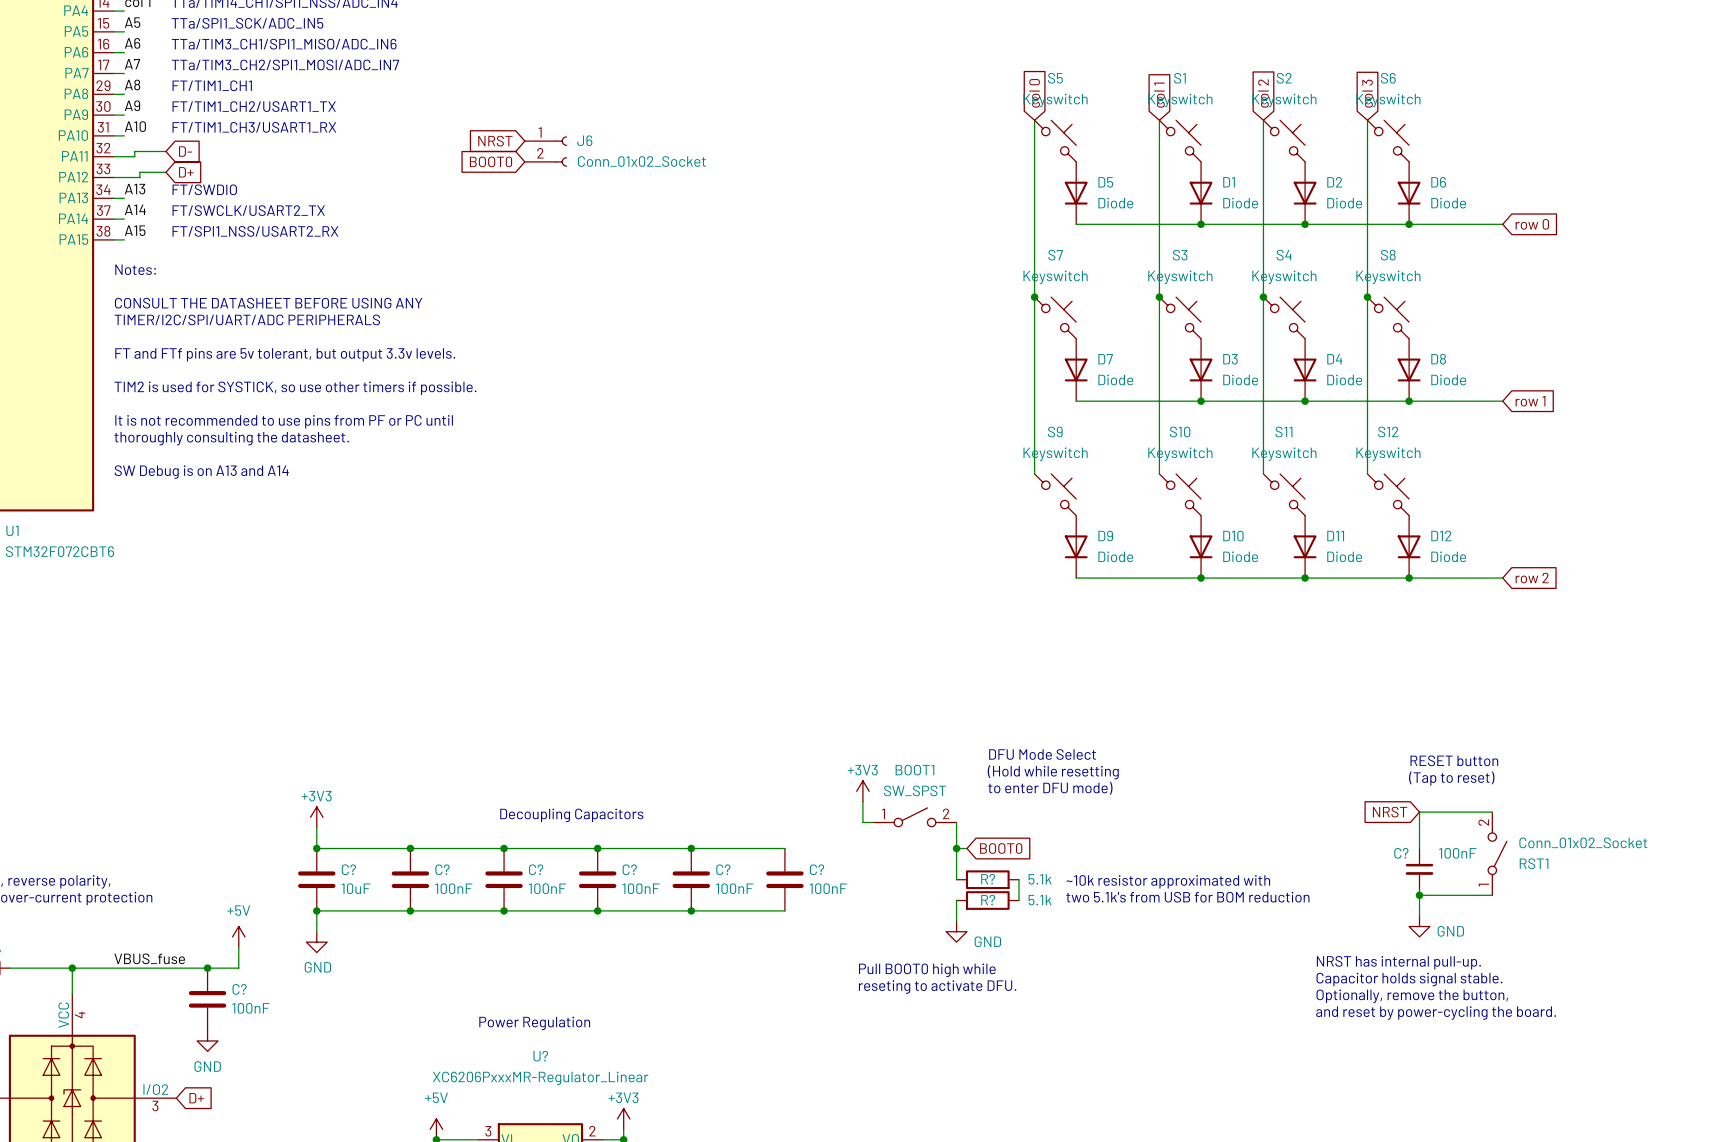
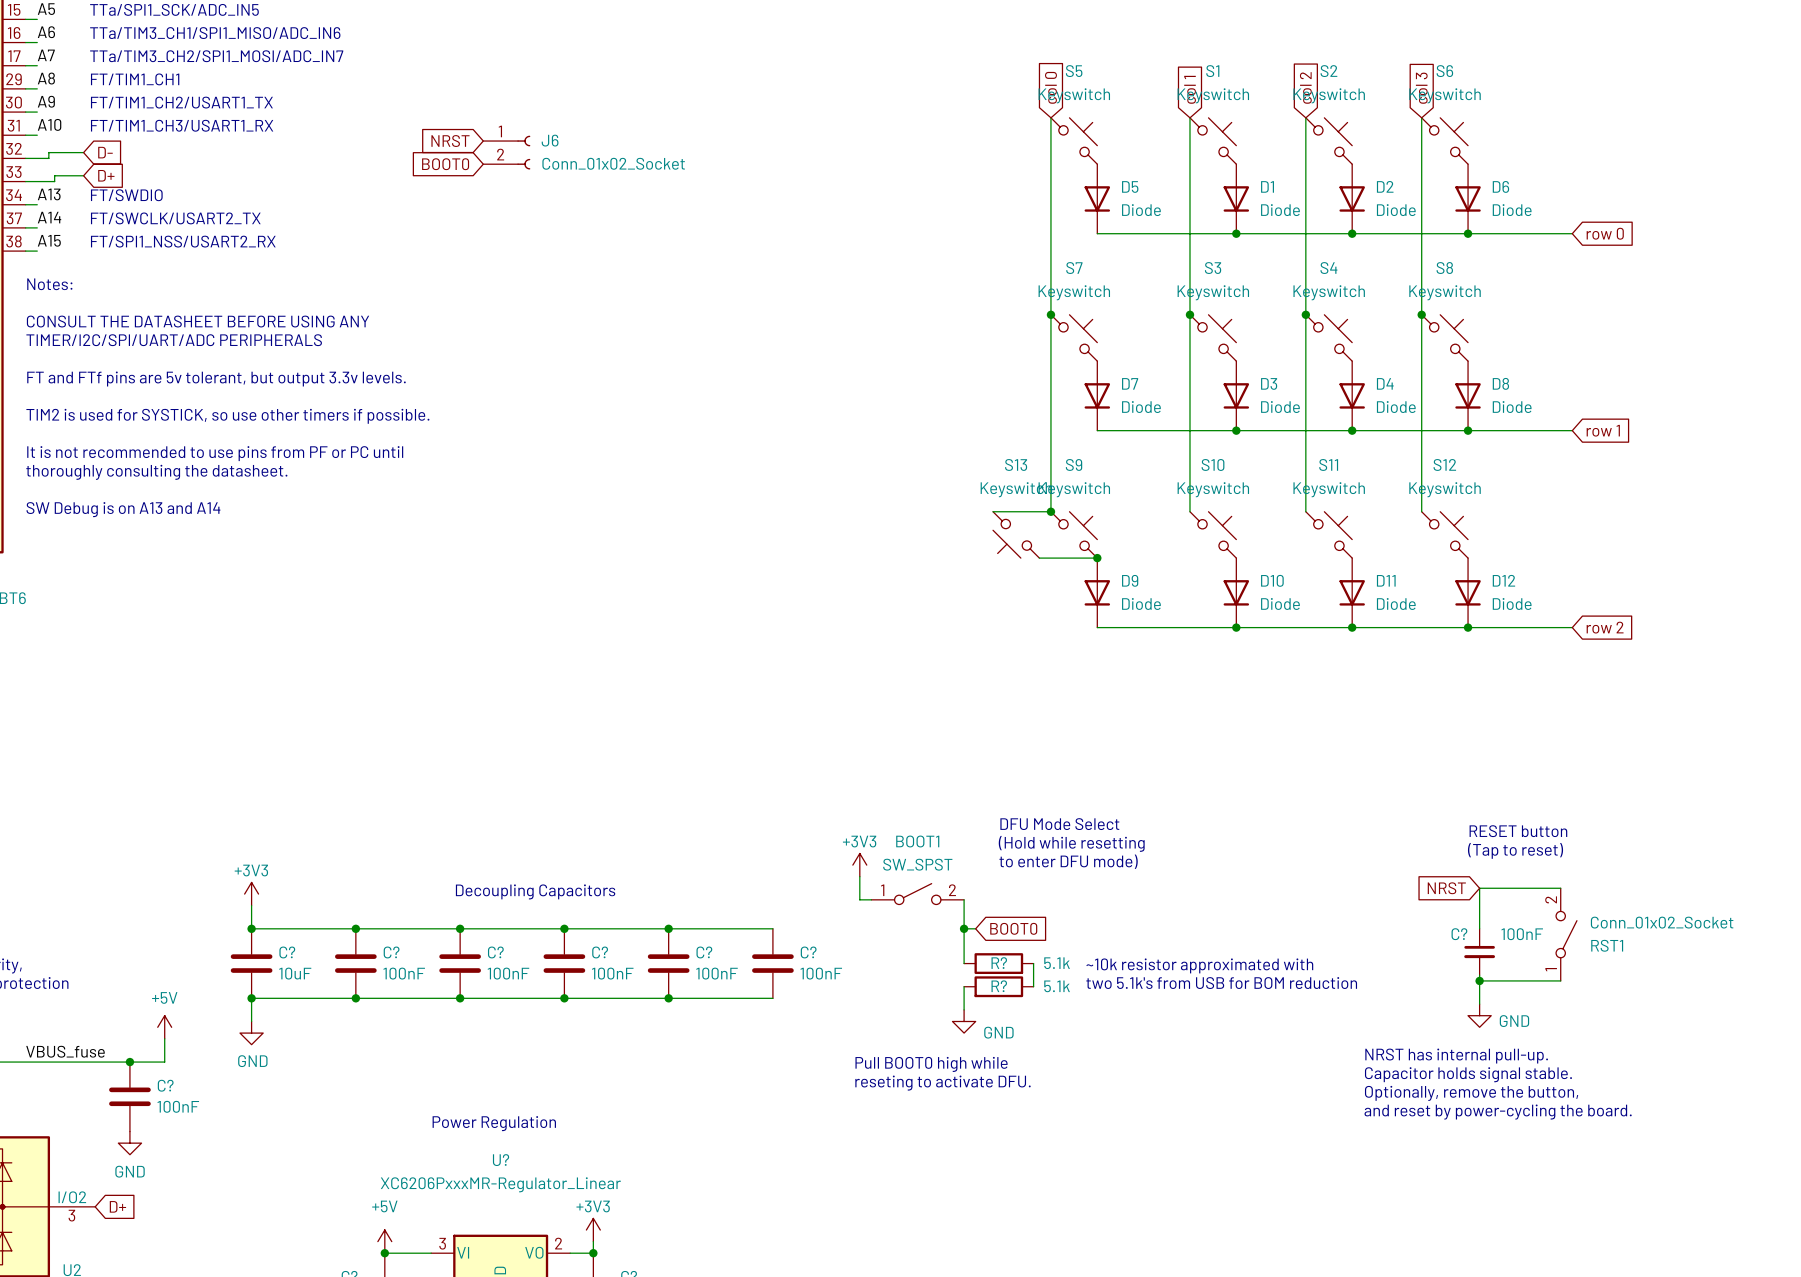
wire: none -> (993, 511) (1050, 511)
junction: none -> (1050, 511)
S13: none -> Keyswitch (1016, 534)
wire: none -> (1039, 558) (1097, 558)
junction: none -> (1097, 558)

